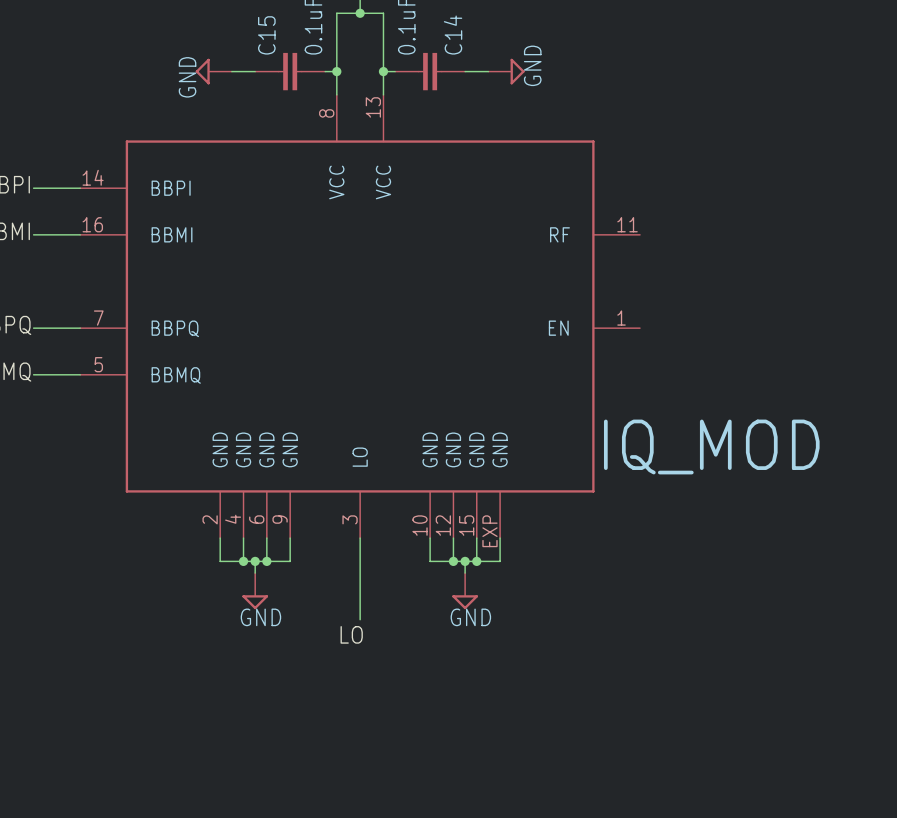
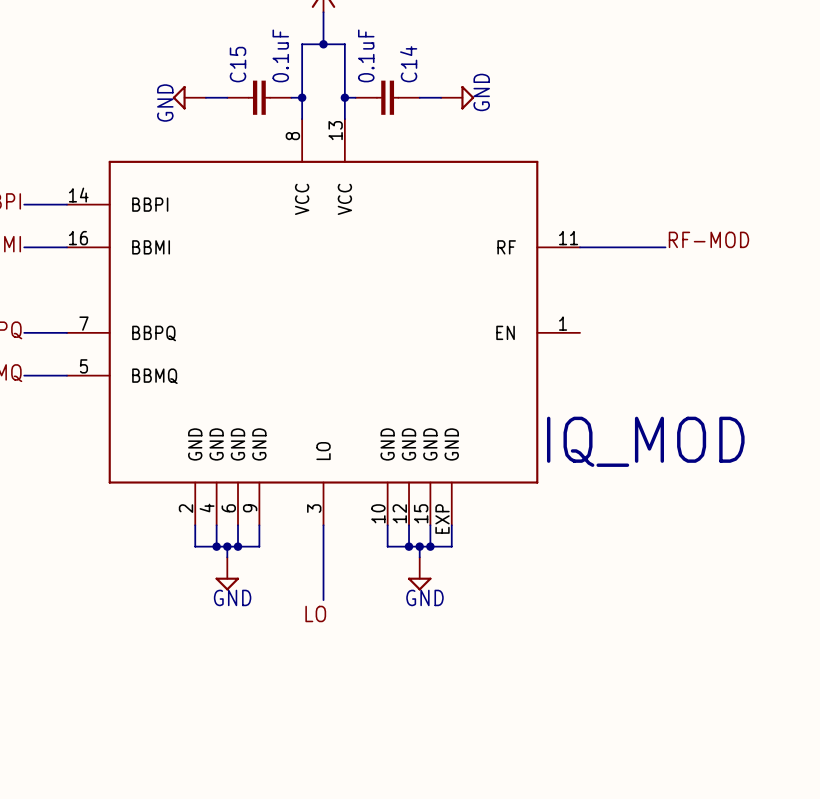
label: none -> RF-MOD (708, 239)
wire: none -> (580, 247) (665, 247)

